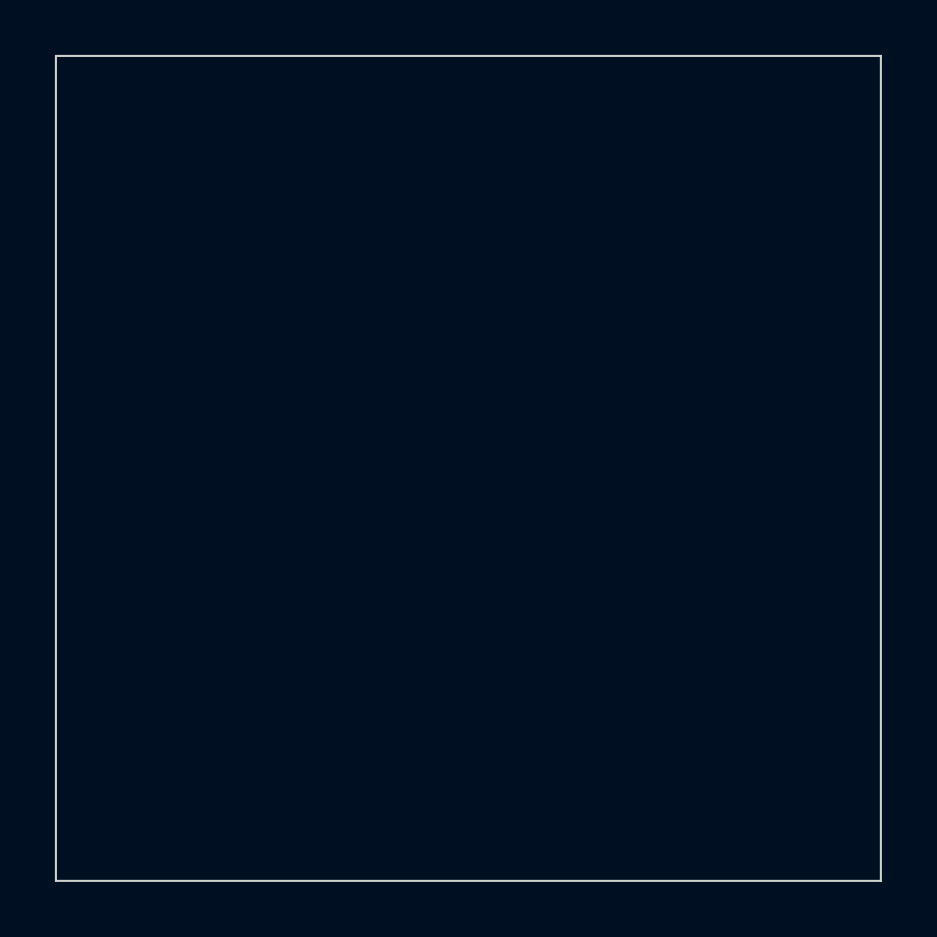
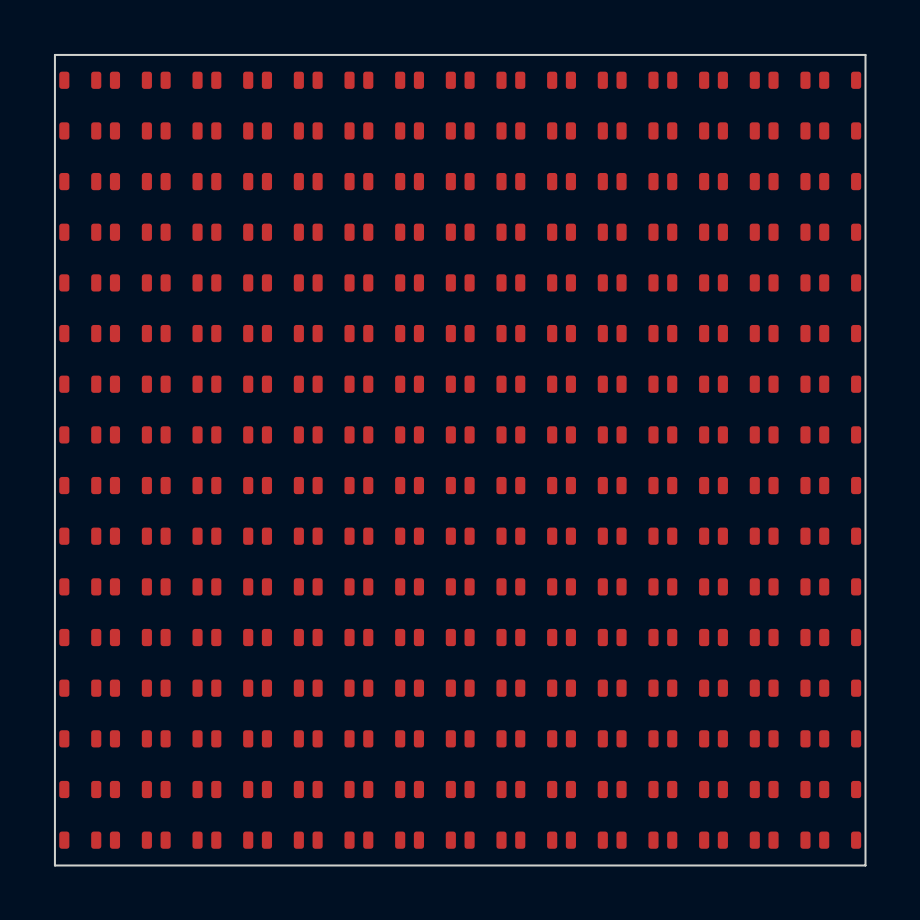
part: none -> (80, 80)
part: none -> (130, 80)
part: none -> (181, 80)
part: none -> (232, 80)
part: none -> (282, 80)
part: none -> (333, 80)
part: none -> (384, 80)
part: none -> (434, 80)
part: none -> (485, 80)
part: none -> (536, 80)
part: none -> (586, 80)
part: none -> (637, 80)
part: none -> (688, 80)
part: none -> (738, 80)
part: none -> (789, 80)
part: none -> (840, 80)
part: none -> (80, 130)
part: none -> (130, 130)
part: none -> (181, 130)
part: none -> (232, 130)
part: none -> (282, 130)
part: none -> (333, 130)
part: none -> (384, 130)
part: none -> (434, 130)
part: none -> (485, 130)
part: none -> (536, 130)
part: none -> (586, 130)
part: none -> (637, 130)
part: none -> (688, 130)
part: none -> (738, 130)
part: none -> (789, 130)
part: none -> (840, 130)
part: none -> (80, 181)
part: none -> (130, 181)
part: none -> (181, 181)
part: none -> (232, 181)
part: none -> (282, 181)
part: none -> (333, 181)
part: none -> (384, 181)
part: none -> (434, 181)
part: none -> (485, 181)
part: none -> (536, 181)
part: none -> (586, 181)
part: none -> (637, 181)
part: none -> (688, 181)
part: none -> (738, 181)
part: none -> (789, 181)
part: none -> (840, 181)
part: none -> (80, 232)
part: none -> (130, 232)
part: none -> (181, 232)
part: none -> (232, 232)
part: none -> (282, 232)
part: none -> (333, 232)
part: none -> (384, 232)
part: none -> (434, 232)
part: none -> (485, 232)
part: none -> (536, 232)
part: none -> (586, 232)
part: none -> (637, 232)
part: none -> (688, 232)
part: none -> (738, 232)
part: none -> (789, 232)
part: none -> (840, 232)
part: none -> (80, 282)
part: none -> (130, 282)
part: none -> (181, 282)
part: none -> (232, 282)
part: none -> (282, 282)
part: none -> (333, 282)
part: none -> (384, 282)
part: none -> (434, 282)
part: none -> (485, 282)
part: none -> (536, 282)
part: none -> (586, 282)
part: none -> (637, 282)
part: none -> (688, 282)
part: none -> (738, 282)
part: none -> (789, 282)
part: none -> (840, 282)
part: none -> (80, 333)
part: none -> (130, 333)
part: none -> (181, 333)
part: none -> (232, 333)
part: none -> (282, 333)
part: none -> (333, 333)
part: none -> (384, 333)
part: none -> (434, 333)
part: none -> (485, 333)
part: none -> (536, 333)
part: none -> (586, 333)
part: none -> (637, 333)
part: none -> (688, 333)
part: none -> (738, 333)
part: none -> (789, 333)
part: none -> (840, 333)
part: none -> (80, 384)
part: none -> (130, 384)
part: none -> (181, 384)
part: none -> (232, 384)
part: none -> (282, 384)
part: none -> (333, 384)
part: none -> (384, 384)
part: none -> (434, 384)
part: none -> (485, 384)
part: none -> (536, 384)
part: none -> (586, 384)
part: none -> (637, 384)
part: none -> (688, 384)
part: none -> (738, 384)
part: none -> (789, 384)
part: none -> (840, 384)
part: none -> (80, 434)
part: none -> (130, 434)
part: none -> (181, 434)
part: none -> (232, 434)
part: none -> (282, 434)
part: none -> (333, 434)
part: none -> (384, 434)
part: none -> (434, 434)
part: none -> (485, 434)
part: none -> (536, 434)
part: none -> (586, 434)
part: none -> (637, 434)
part: none -> (688, 434)
part: none -> (738, 434)
part: none -> (789, 434)
part: none -> (840, 434)
part: none -> (80, 485)
part: none -> (130, 485)
part: none -> (181, 485)
part: none -> (232, 485)
part: none -> (282, 485)
part: none -> (333, 485)
part: none -> (384, 485)
part: none -> (434, 485)
part: none -> (485, 485)
part: none -> (536, 485)
part: none -> (586, 485)
part: none -> (637, 485)
part: none -> (688, 485)
part: none -> (738, 485)
part: none -> (789, 485)
part: none -> (840, 485)
part: none -> (80, 536)
part: none -> (130, 536)
part: none -> (181, 536)
part: none -> (232, 536)
part: none -> (282, 536)
part: none -> (333, 536)
part: none -> (384, 536)
part: none -> (434, 536)
part: none -> (485, 536)
part: none -> (536, 536)
part: none -> (586, 536)
part: none -> (637, 536)
part: none -> (688, 536)
part: none -> (738, 536)
part: none -> (789, 536)
part: none -> (840, 536)
part: none -> (80, 586)
part: none -> (130, 586)
part: none -> (181, 586)
part: none -> (232, 586)
part: none -> (282, 586)
part: none -> (333, 586)
part: none -> (384, 586)
part: none -> (434, 586)
part: none -> (485, 586)
part: none -> (536, 586)
part: none -> (586, 586)
part: none -> (637, 586)
part: none -> (688, 586)
part: none -> (738, 586)
part: none -> (789, 586)
part: none -> (840, 586)
part: none -> (80, 637)
part: none -> (130, 637)
part: none -> (181, 637)
part: none -> (232, 637)
part: none -> (282, 637)
part: none -> (333, 637)
part: none -> (384, 637)
part: none -> (434, 637)
part: none -> (485, 637)
part: none -> (536, 637)
part: none -> (586, 637)
part: none -> (637, 637)
part: none -> (688, 637)
part: none -> (738, 637)
part: none -> (789, 637)
part: none -> (840, 637)
part: none -> (80, 688)
part: none -> (130, 688)
part: none -> (181, 688)
part: none -> (232, 688)
part: none -> (282, 688)
part: none -> (333, 688)
part: none -> (384, 688)
part: none -> (434, 688)
part: none -> (485, 688)
part: none -> (536, 688)
part: none -> (586, 688)
part: none -> (637, 688)
part: none -> (688, 688)
part: none -> (738, 688)
part: none -> (789, 688)
part: none -> (840, 688)
part: none -> (80, 738)
part: none -> (130, 738)
part: none -> (181, 738)
part: none -> (232, 738)
part: none -> (282, 738)
part: none -> (333, 738)
part: none -> (384, 738)
part: none -> (434, 738)
part: none -> (485, 738)
part: none -> (536, 738)
part: none -> (586, 738)
part: none -> (637, 738)
part: none -> (688, 738)
part: none -> (738, 738)
part: none -> (789, 738)
part: none -> (840, 738)
part: none -> (80, 789)
part: none -> (130, 789)
part: none -> (181, 789)
part: none -> (232, 789)
part: none -> (282, 789)
part: none -> (333, 789)
part: none -> (384, 789)
part: none -> (434, 789)
part: none -> (485, 789)
part: none -> (536, 789)
part: none -> (586, 789)
part: none -> (637, 789)
part: none -> (688, 789)
part: none -> (738, 789)
part: none -> (789, 789)
part: none -> (840, 789)
part: none -> (80, 840)
part: none -> (130, 840)
part: none -> (181, 840)
part: none -> (232, 840)
part: none -> (282, 840)
part: none -> (333, 840)
part: none -> (384, 840)
part: none -> (434, 840)
part: none -> (485, 840)
part: none -> (536, 840)
part: none -> (586, 840)
part: none -> (637, 840)
part: none -> (688, 840)
part: none -> (738, 840)
part: none -> (789, 840)
part: none -> (840, 840)

